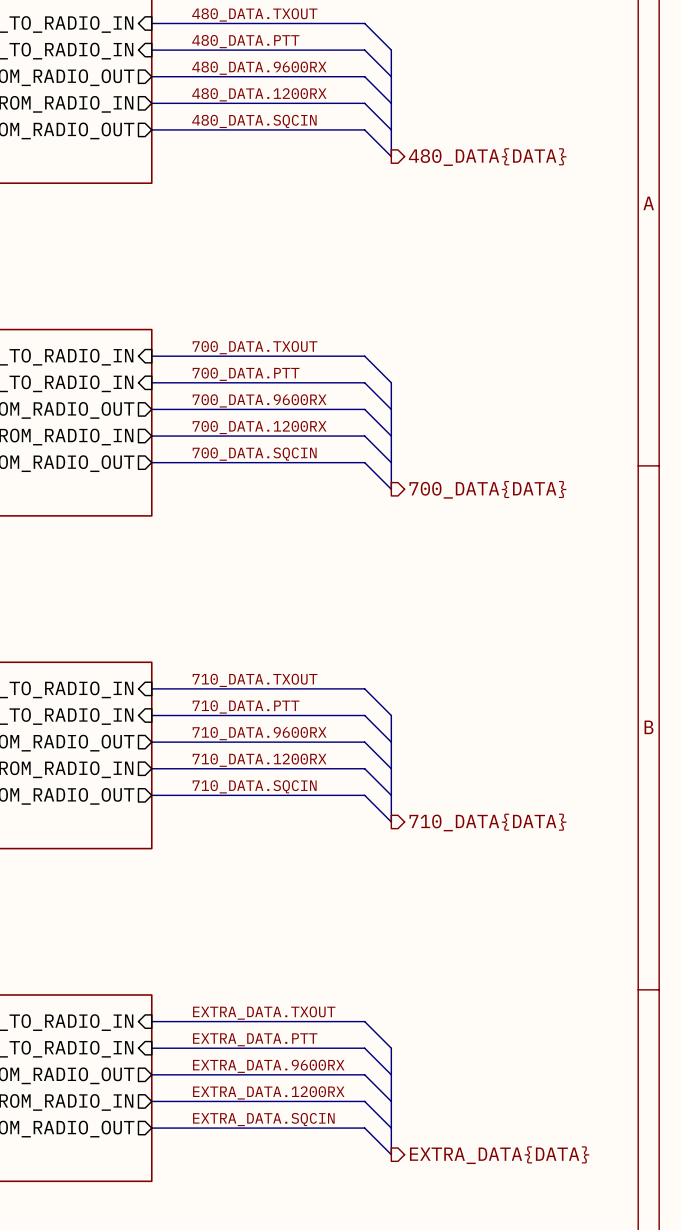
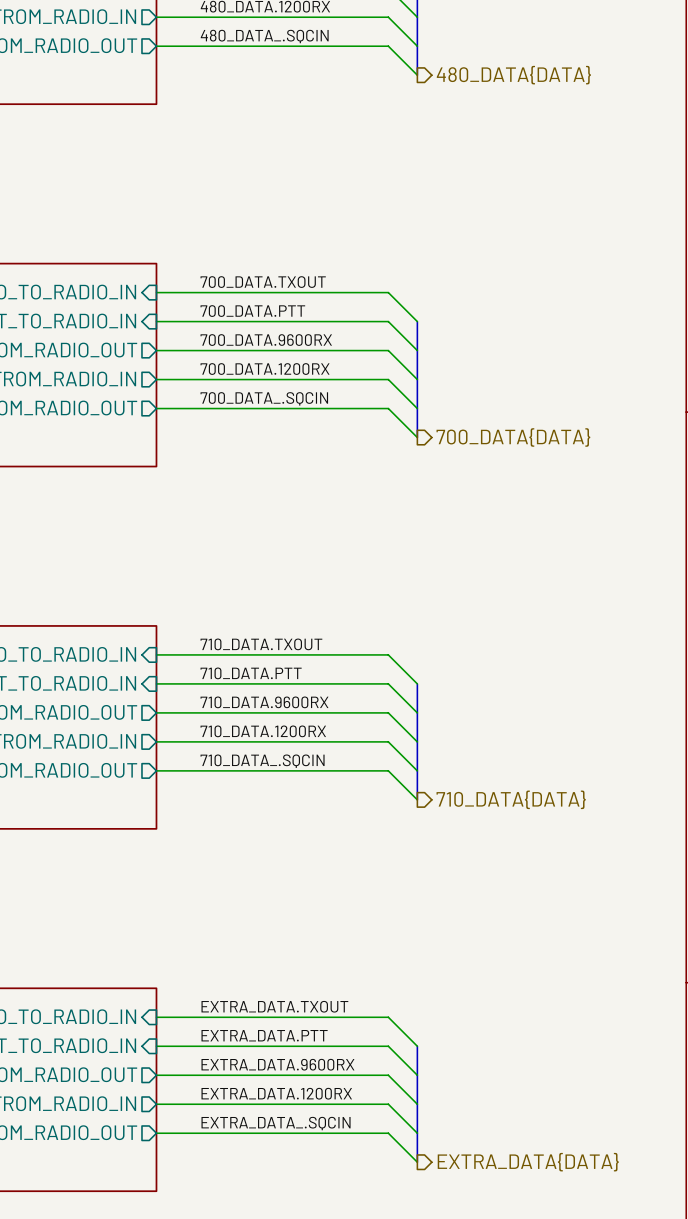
label: 480_DATA.SQCIN (254, 121) -> 480_DATA_.SQCIN (264, 36)
label: 700_DATA.SQCIN (254, 454) -> 700_DATA_.SQCIN (264, 398)
label: 710_DATA.SQCIN (254, 786) -> 710_DATA_.SQCIN (262, 761)
label: EXTRA_DATA.SQCIN (263, 1119) -> EXTRA_DATA_.SQCIN (276, 1123)

